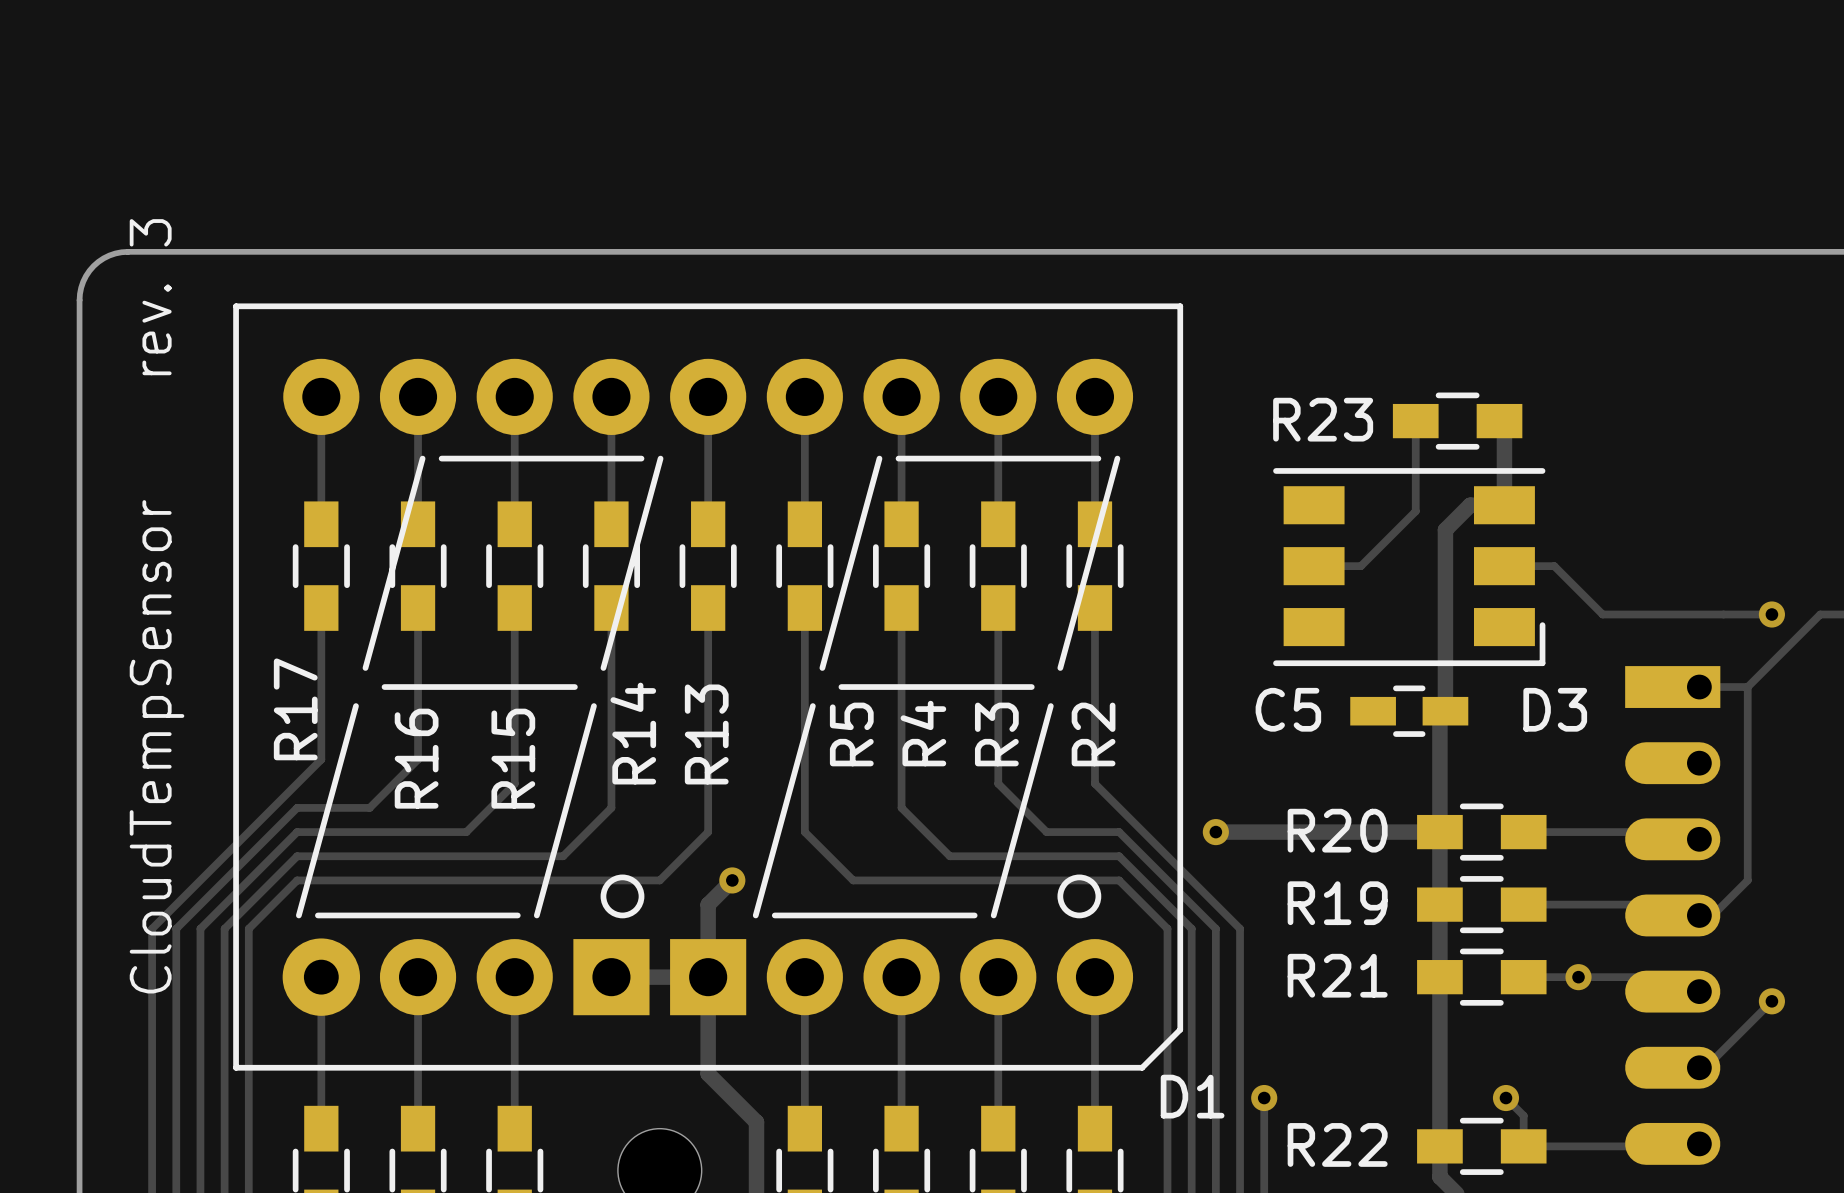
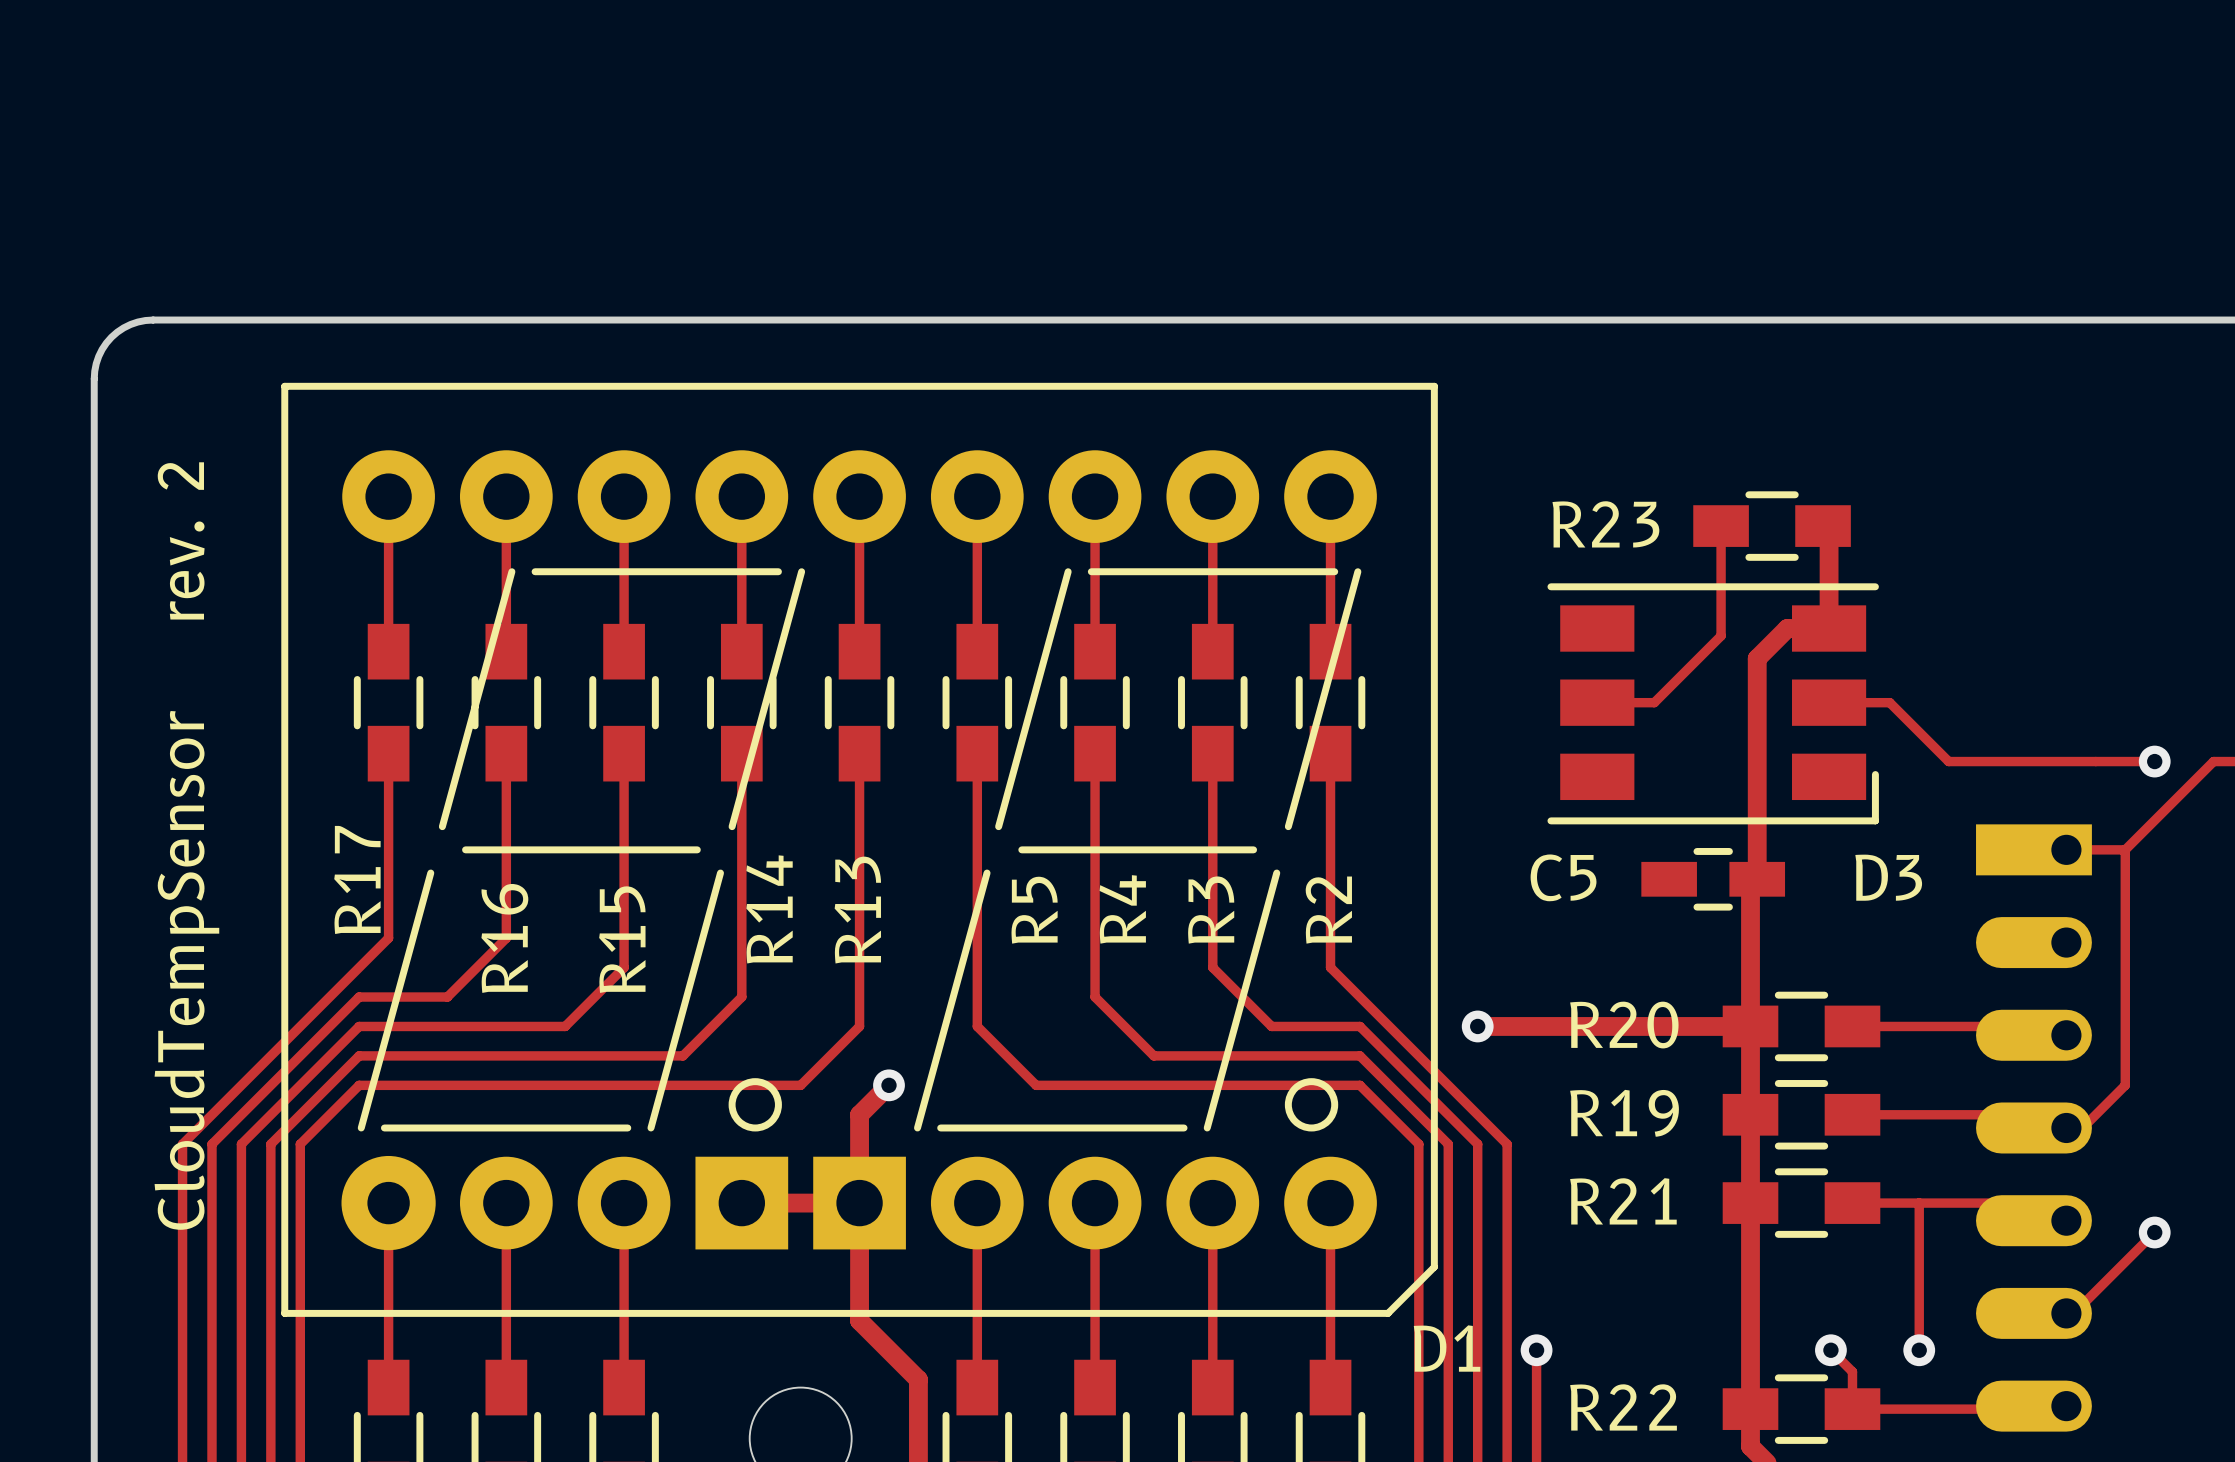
text: CloudTempSensor rev. 3 (157, 606) -> CloudTempSensor rev. 2 (186, 846)
track: none -> (1919, 1203) (1919, 1350)
via position: (1578, 977) -> (1919, 1350)

